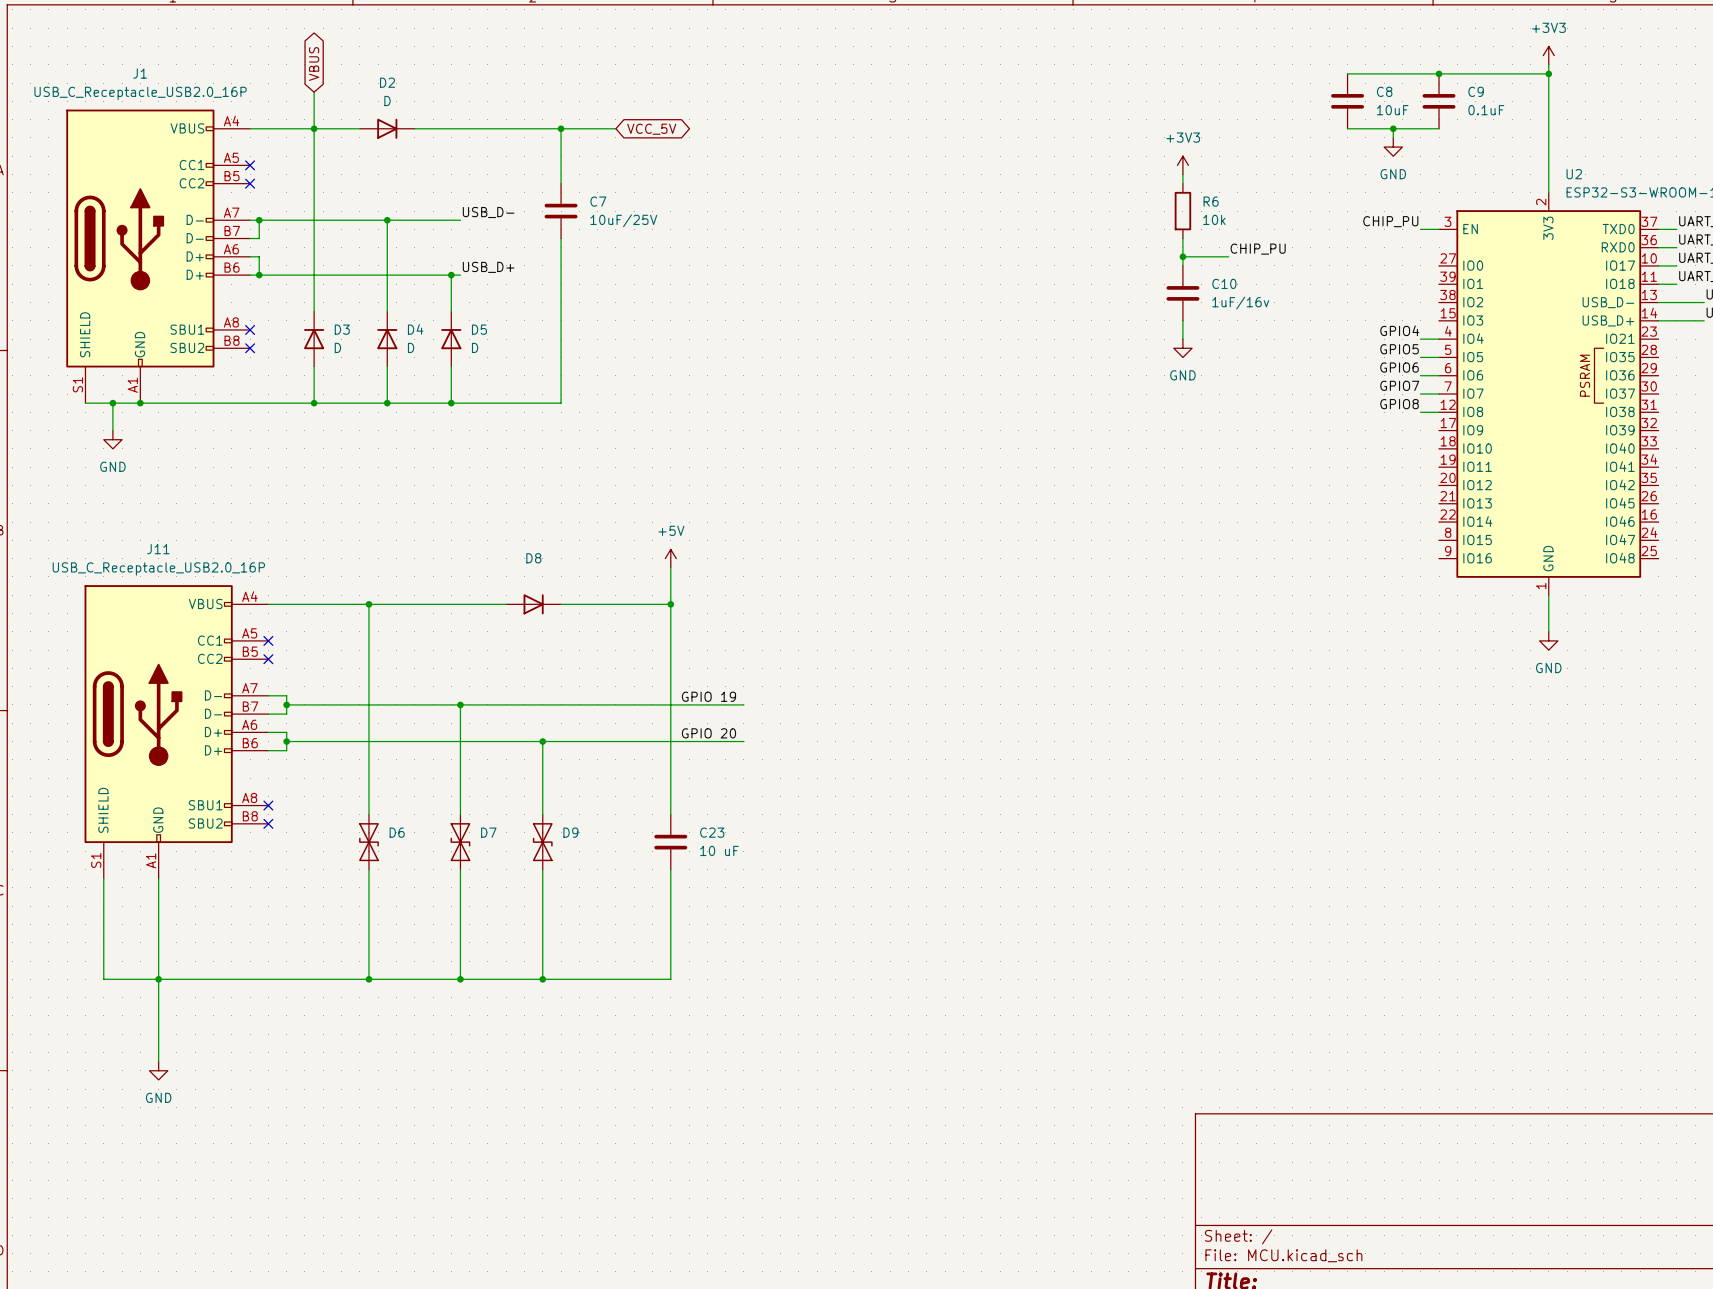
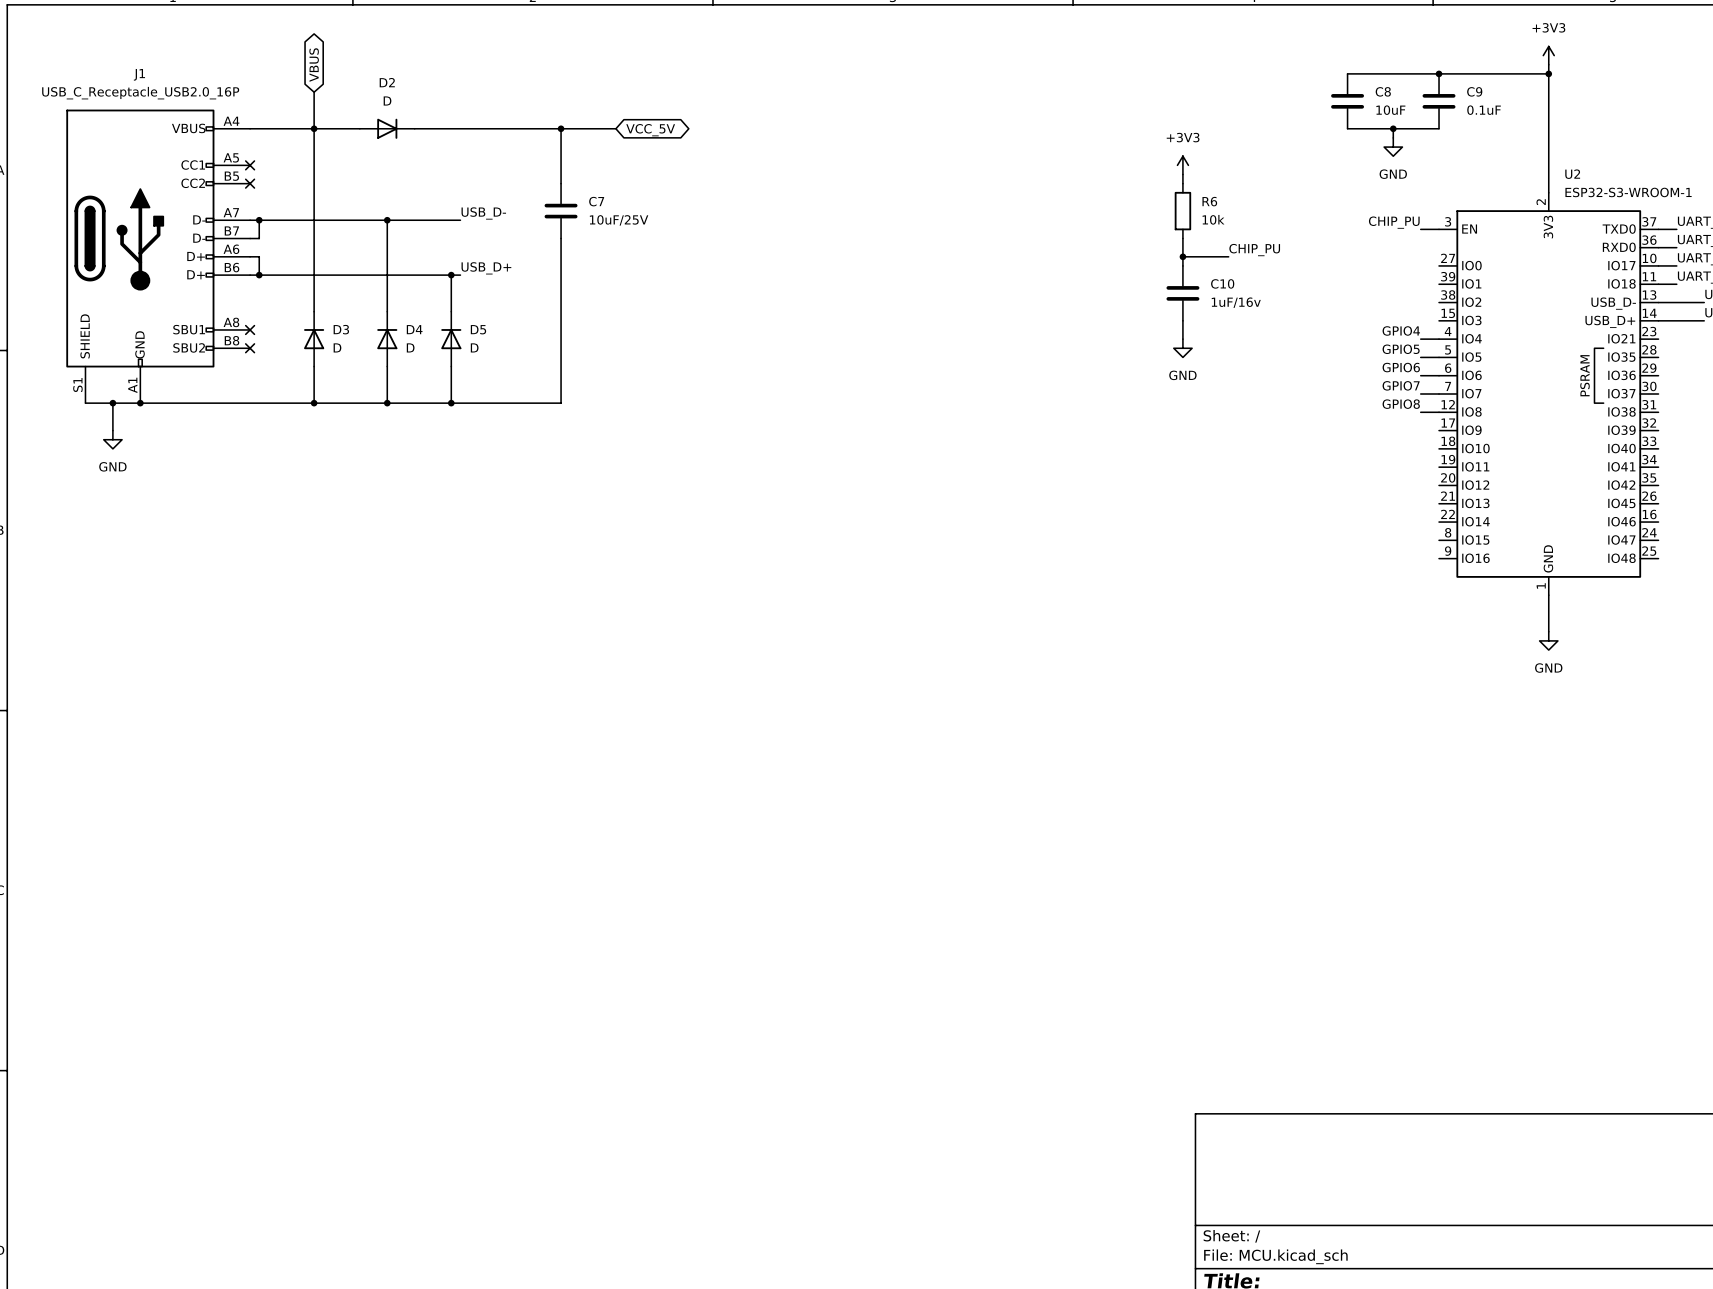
power symbol: +5V (670, 558) -> none
wire: (670, 567) (670, 814) -> none
wire: (268, 604) (506, 604) -> none
wire: (368, 604) (368, 814) -> none
junction: (368, 604) -> none
D8: (533, 604) -> none
wire: (561, 604) (670, 604) -> none
junction: (670, 604) -> none
no-connect mark: (268, 640) -> none
no-connect mark: (268, 659) -> none
wire: (268, 695) (286, 695) (286, 714) (268, 714) -> none
label: GPIO 19 (708, 696) -> none
wire: (286, 704) (743, 704) -> none
junction: (286, 704) -> none
wire: (460, 704) (460, 814) -> none
junction: (460, 704) -> none
J11: USB_C_Receptacle_USB2.0_16P (176, 731) -> none
wire: (268, 732) (286, 732) (286, 750) (268, 750) -> none
label: GPIO 20 (708, 733) -> none
wire: (286, 741) (743, 741) -> none
junction: (286, 741) -> none
wire: (542, 741) (542, 814) -> none
junction: (542, 741) -> none
no-connect mark: (268, 805) -> none
no-connect mark: (268, 823) -> none
D6: (368, 842) -> none
D7: (460, 842) -> none
D9: (542, 842) -> none
C23: 10 uF (670, 842) -> none
wire: (368, 869) (368, 979) -> none
wire: (460, 869) (460, 979) -> none
wire: (542, 869) (542, 979) -> none
wire: (670, 869) (670, 979) (103, 979) (103, 878) -> none
wire: (158, 878) (158, 1061) -> none
junction: (158, 979) -> none
junction: (368, 979) -> none
junction: (460, 979) -> none
junction: (542, 979) -> none
power symbol: GND (158, 1070) -> none

